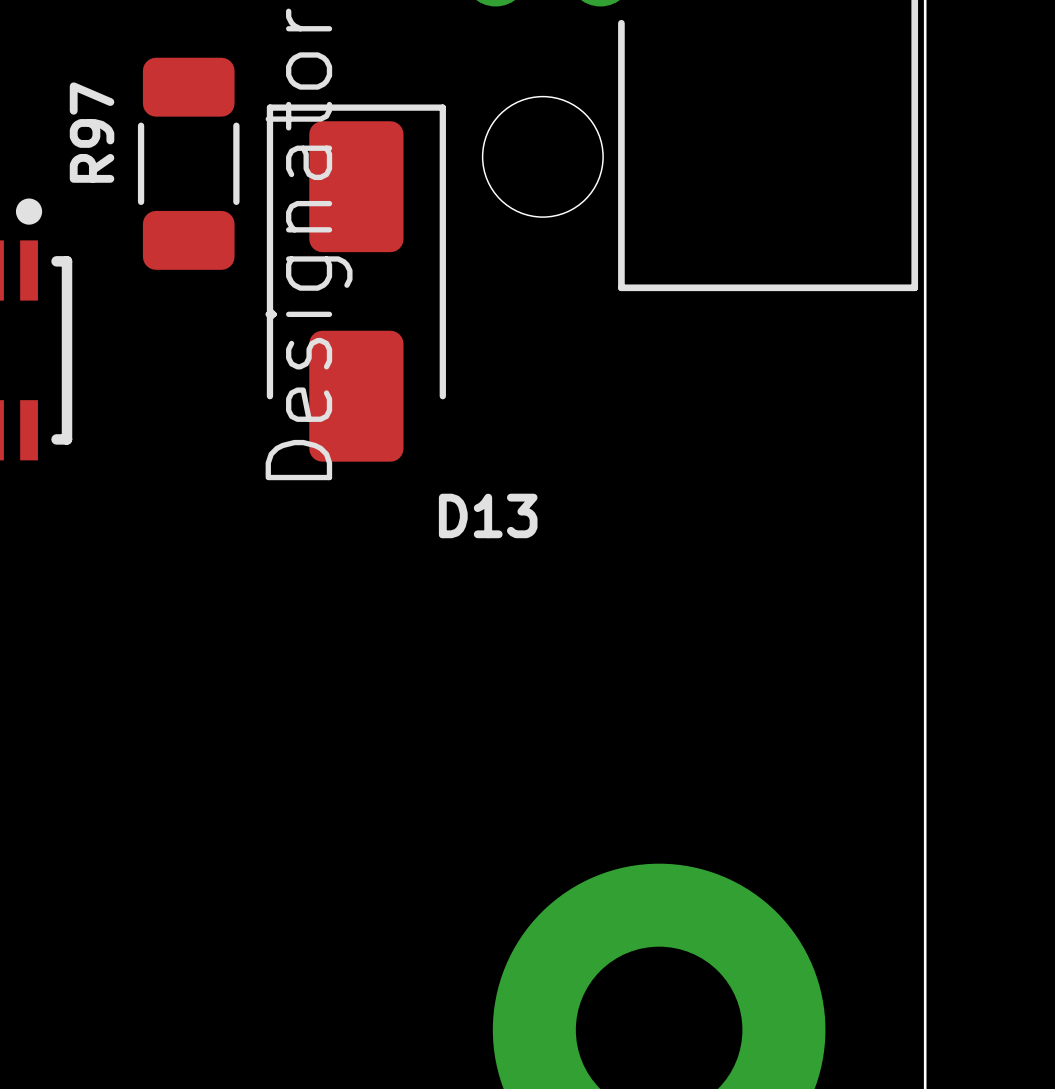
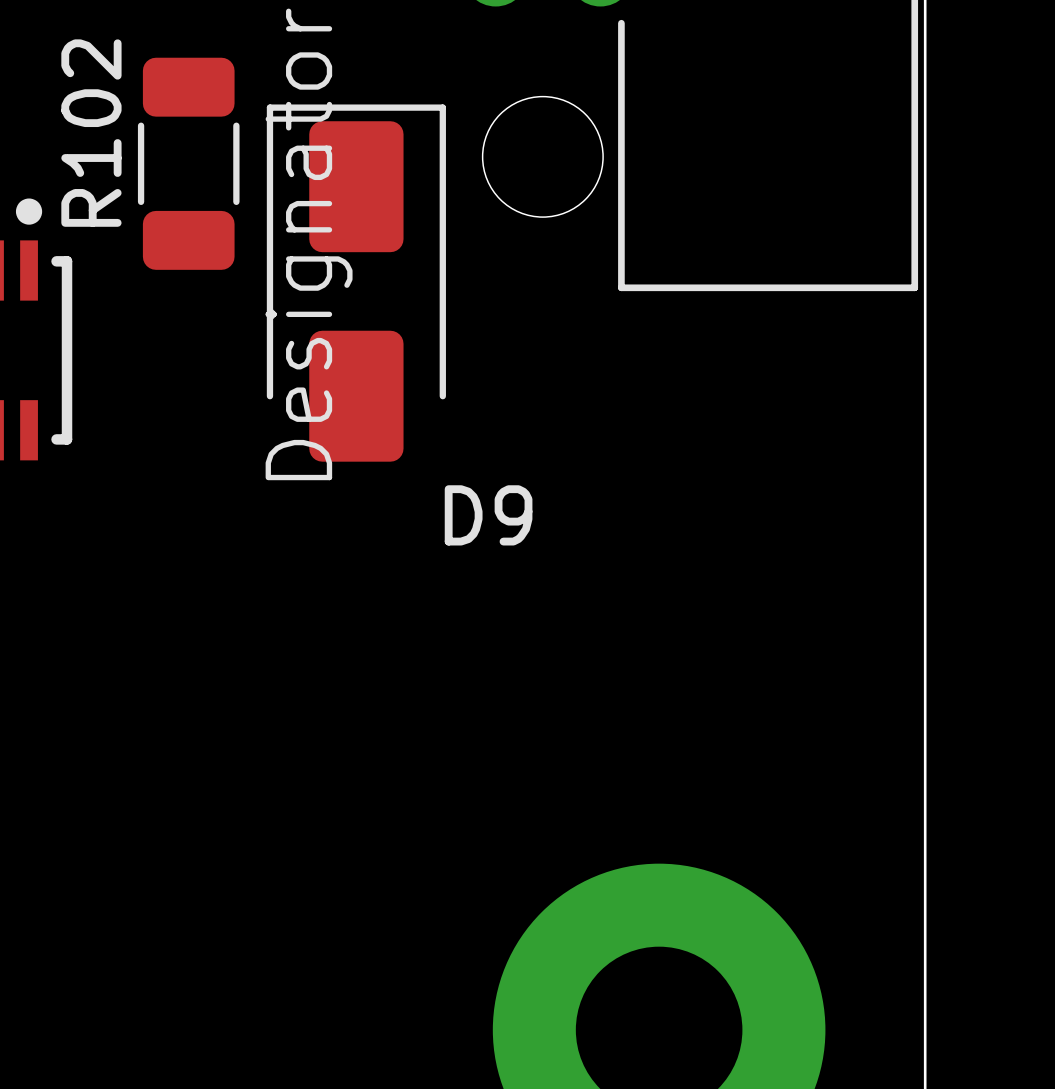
R97 name: R97 (92, 132) -> R102 (91, 133)
D13 name: D13 (488, 515) -> D9 (488, 515)

